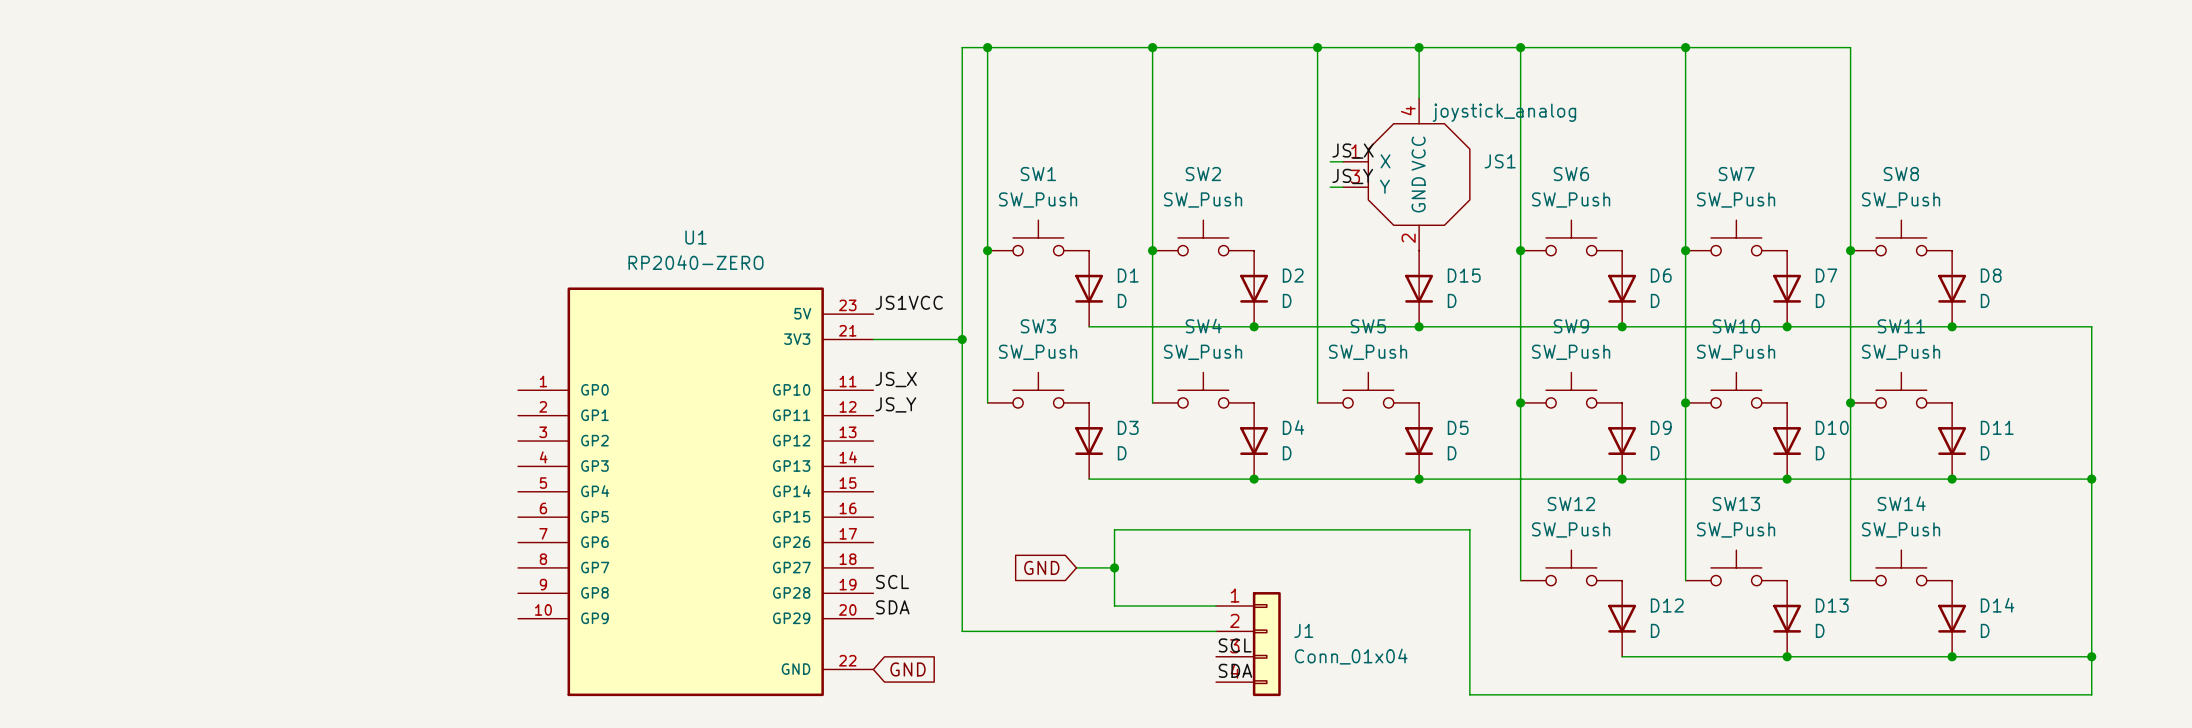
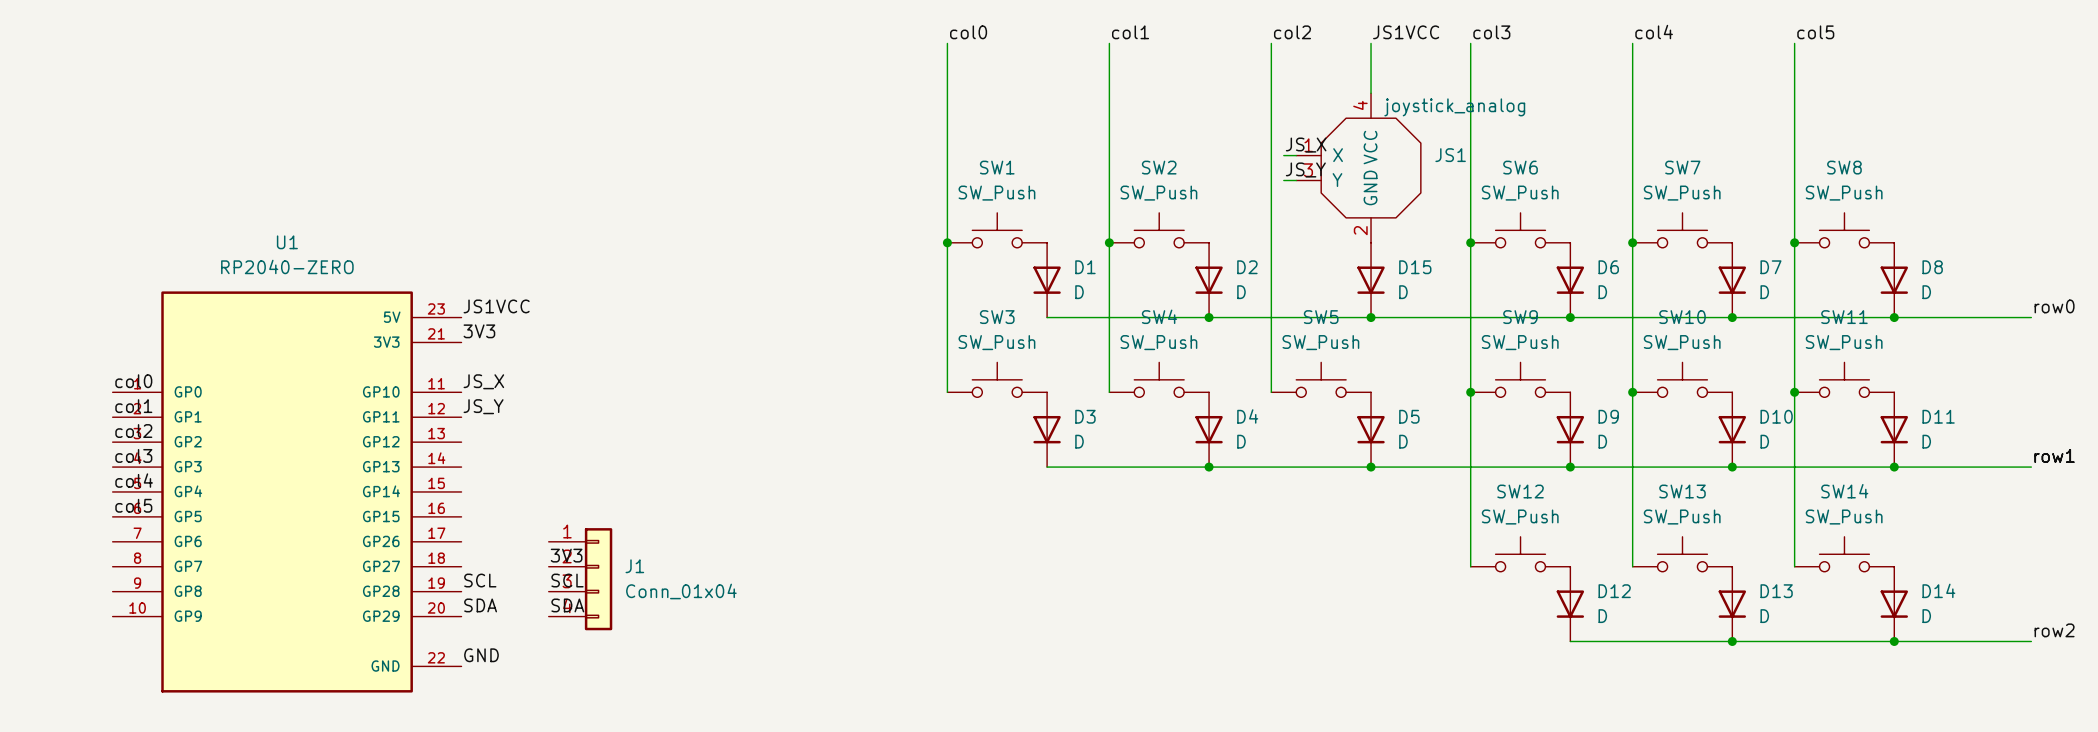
label: none -> col4 (1654, 32)
label: none -> col0 (968, 32)
label: none -> col1 (1130, 32)
label: none -> col2 (1292, 32)
label: none -> JS1VCC (1406, 32)
label: none -> col3 (1491, 32)
label: none -> col5 (1815, 32)
junction: (987, 47) -> none
junction: (1152, 47) -> none
junction: (1317, 47) -> none
junction: (1419, 47) -> none
junction: (1520, 47) -> none
junction: (1685, 47) -> none
wire: (1850, 47) (962, 47) (962, 631) (1216, 631) -> none
label: JS1VCC (909, 302) -> none
label: none -> JS1VCC (496, 306)
label: none -> row0 (2054, 306)
wire: (2091, 326) (2091, 694) (1469, 694) (1469, 529) (1114, 529) (1114, 606) (1216, 606) -> none
wire: (873, 339) (962, 339) -> none
junction: (962, 339) -> none
label: none -> 3V3 (479, 331)
label: JS_X (896, 379) -> none
label: none -> col0 (133, 381)
label: none -> JS_X (483, 381)
label: JS_Y (895, 404) -> none
label: none -> col1 (133, 406)
label: none -> JS_Y (483, 406)
label: none -> col2 (133, 431)
label: none -> col3 (133, 455)
label: none -> row1 (2054, 455)
junction: (2091, 479) -> none
U1 position: (695, 491) -> (287, 491)
label: none -> col4 (134, 480)
label: none -> col5 (133, 505)
global label: GND (1041, 567) -> none
wire: (1076, 567) (1114, 567) -> none
junction: (1114, 567) -> none
label: none -> 3V3 (566, 555)
label: SCL (892, 581) -> none
label: none -> SCL (480, 580)
label: none -> SCL (567, 580)
label: SDA (892, 607) -> none
label: none -> SDA (480, 605)
label: none -> SDA (567, 605)
J1 position: (1248, 644) -> (580, 579)
label: SCL (1235, 645) -> none
label: none -> row2 (2054, 630)
junction: (2091, 656) -> none
global label: GND (908, 669) -> none
label: none -> GND (481, 655)
label: SDA (1235, 670) -> none

